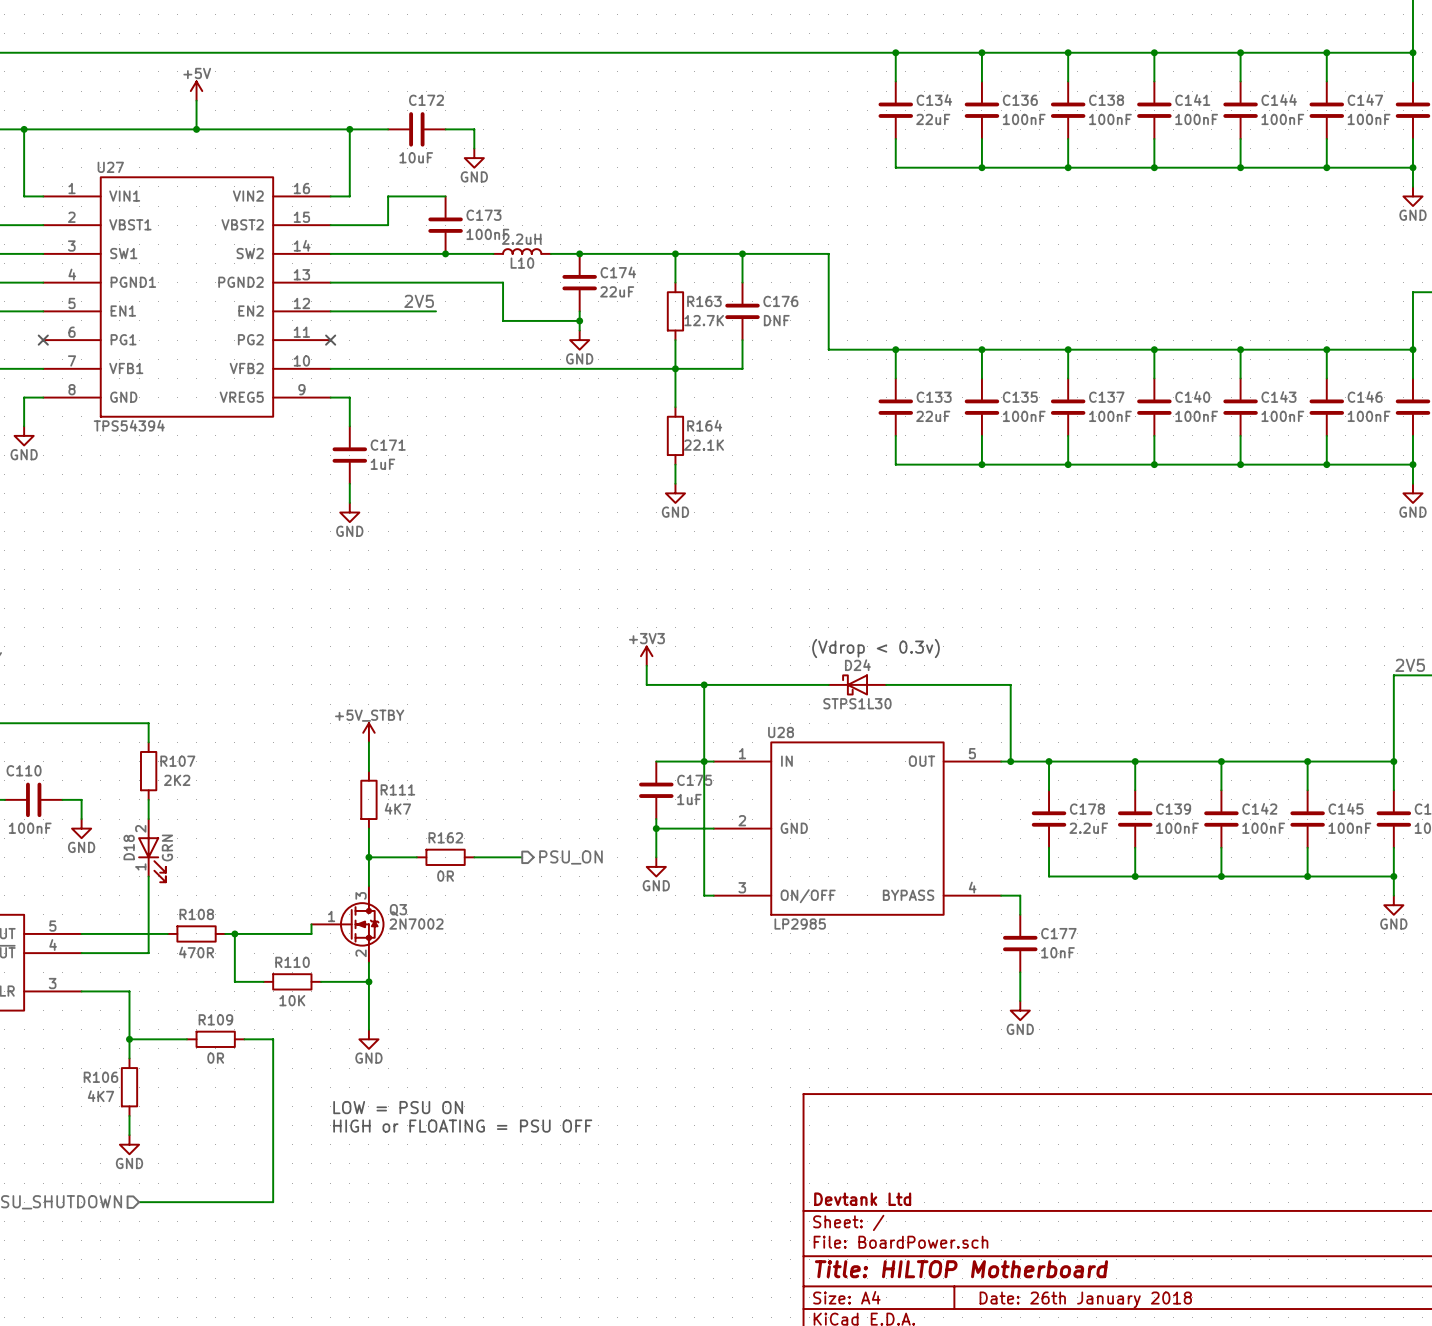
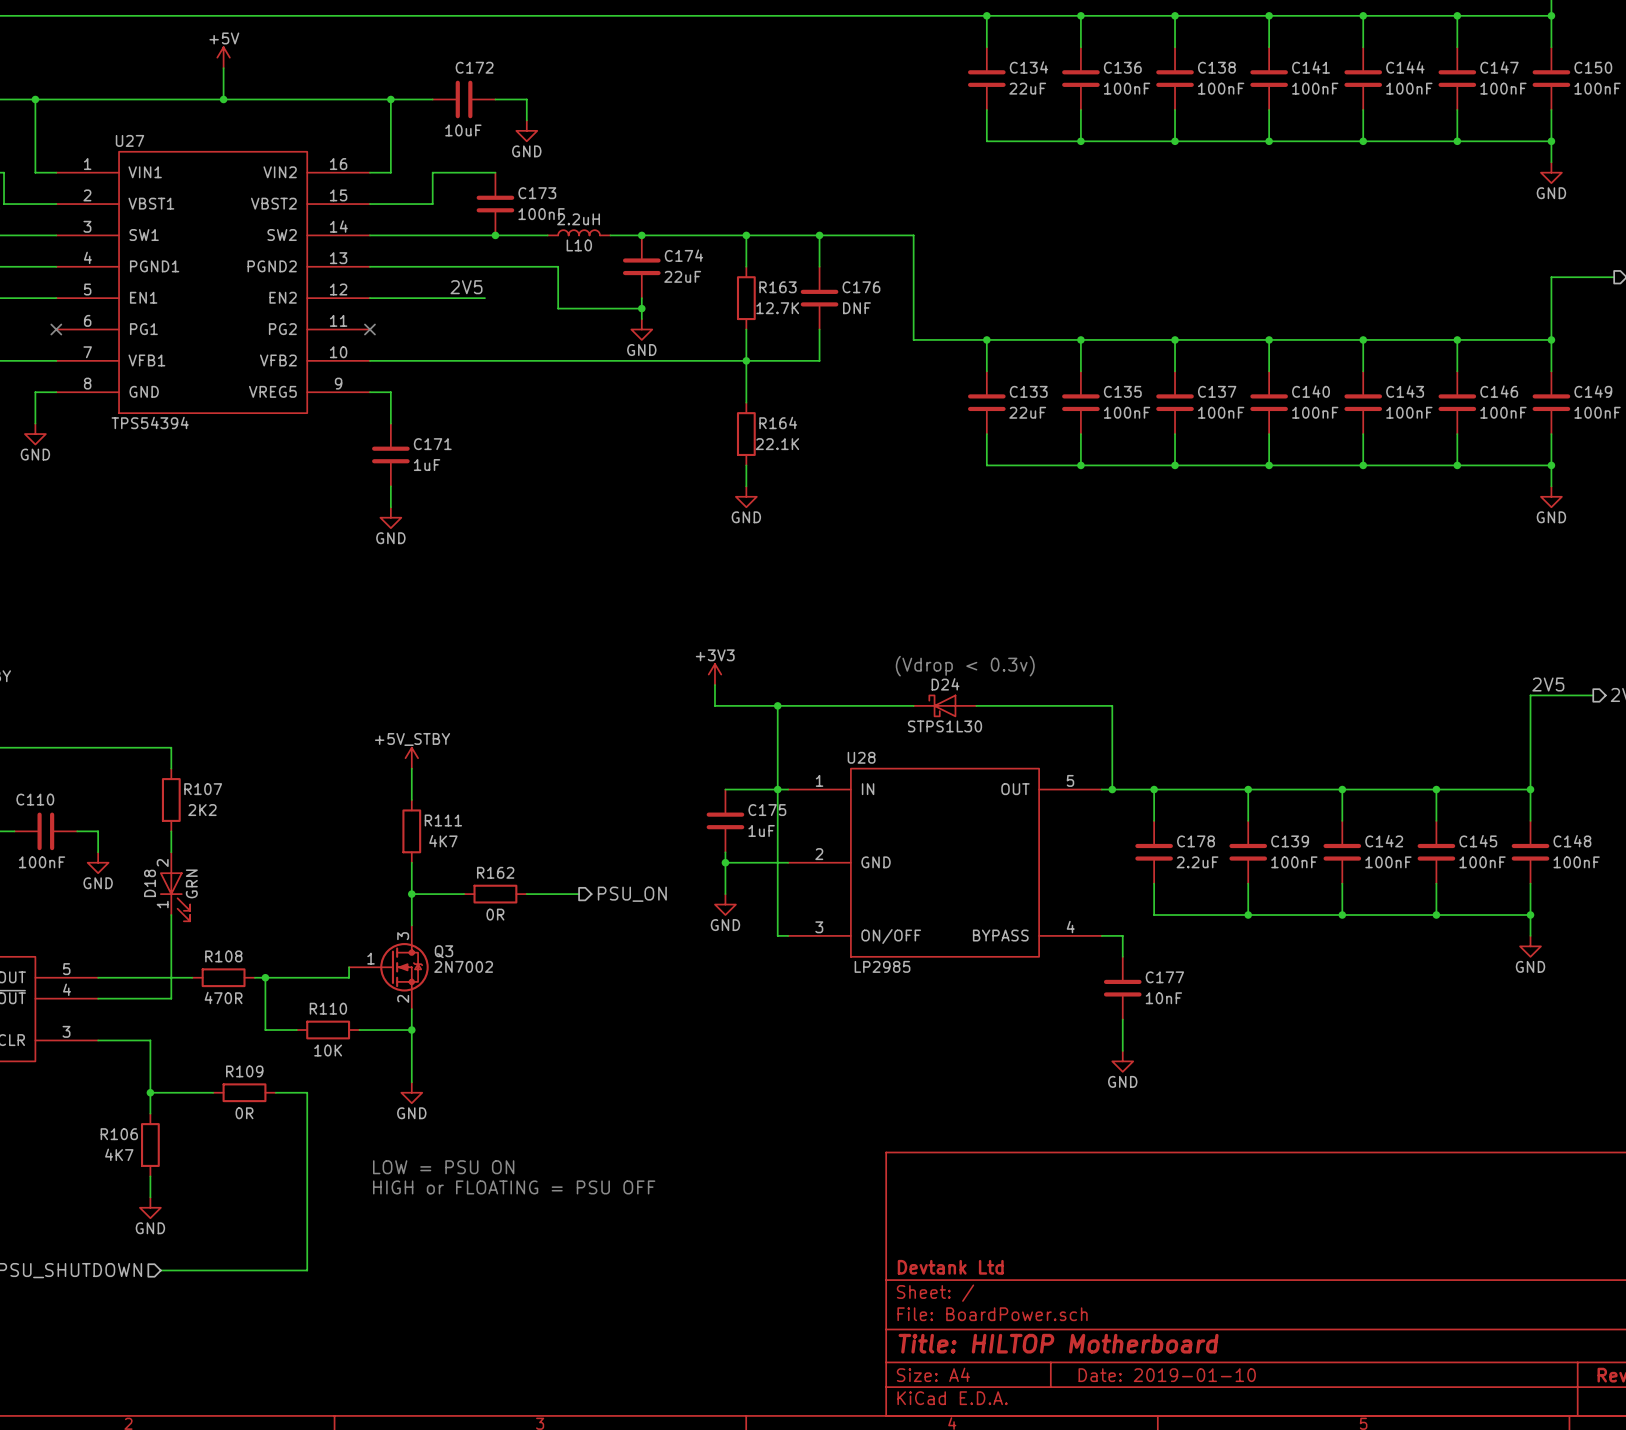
title block: Date: 26th January 2018 (1085, 1299) -> Date: 2019-01-10 (1167, 1375)

